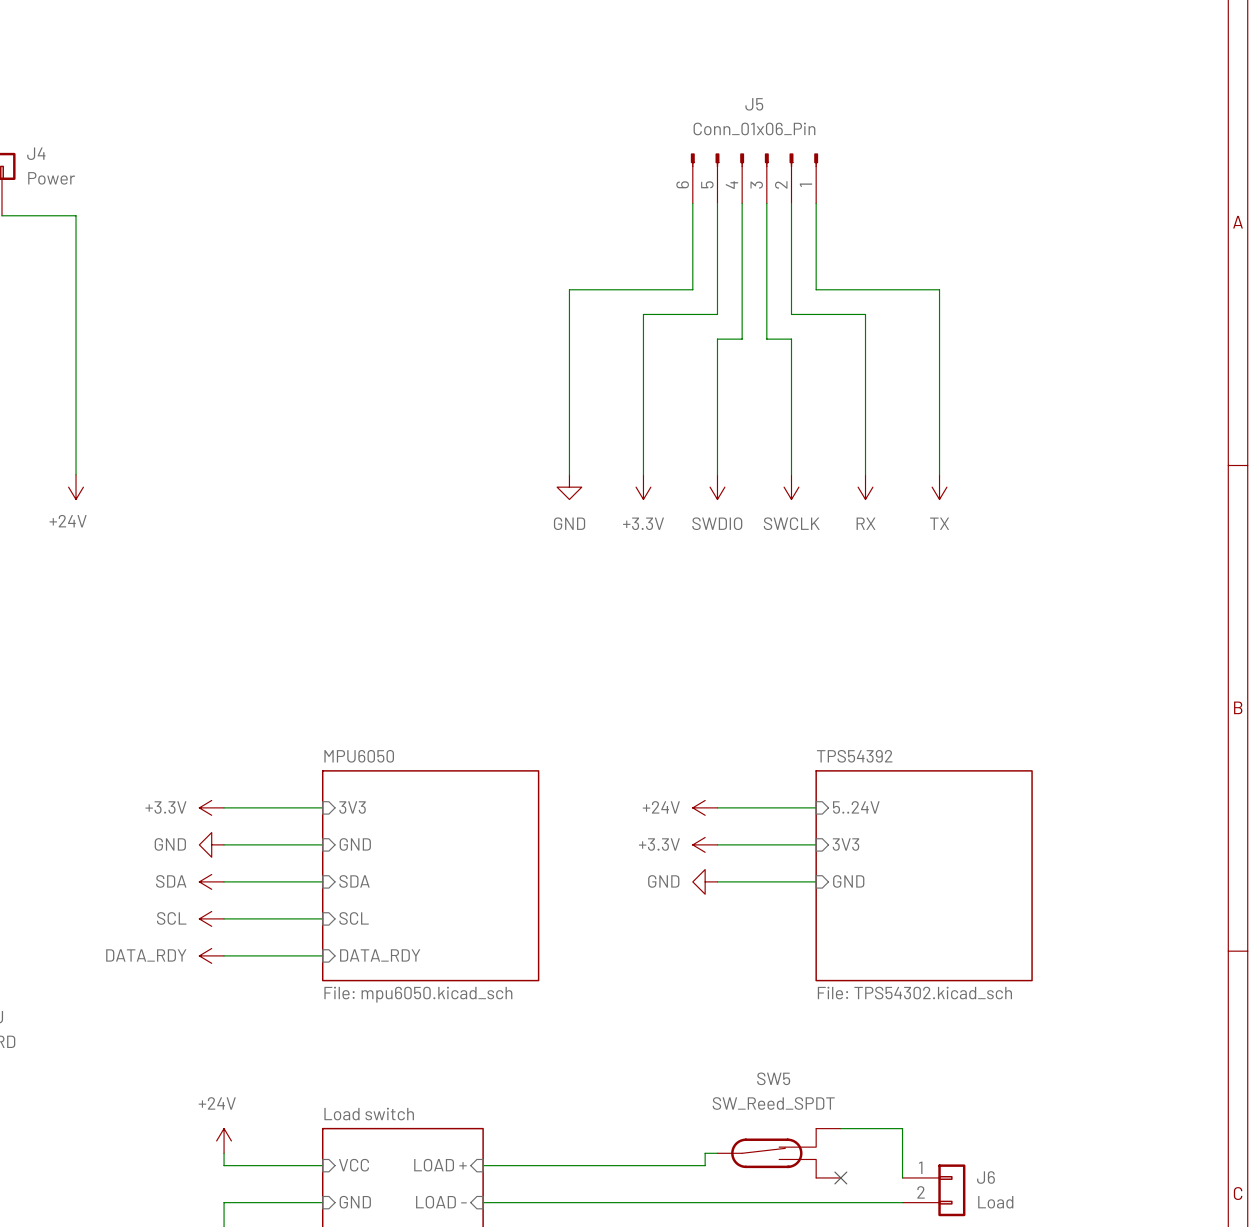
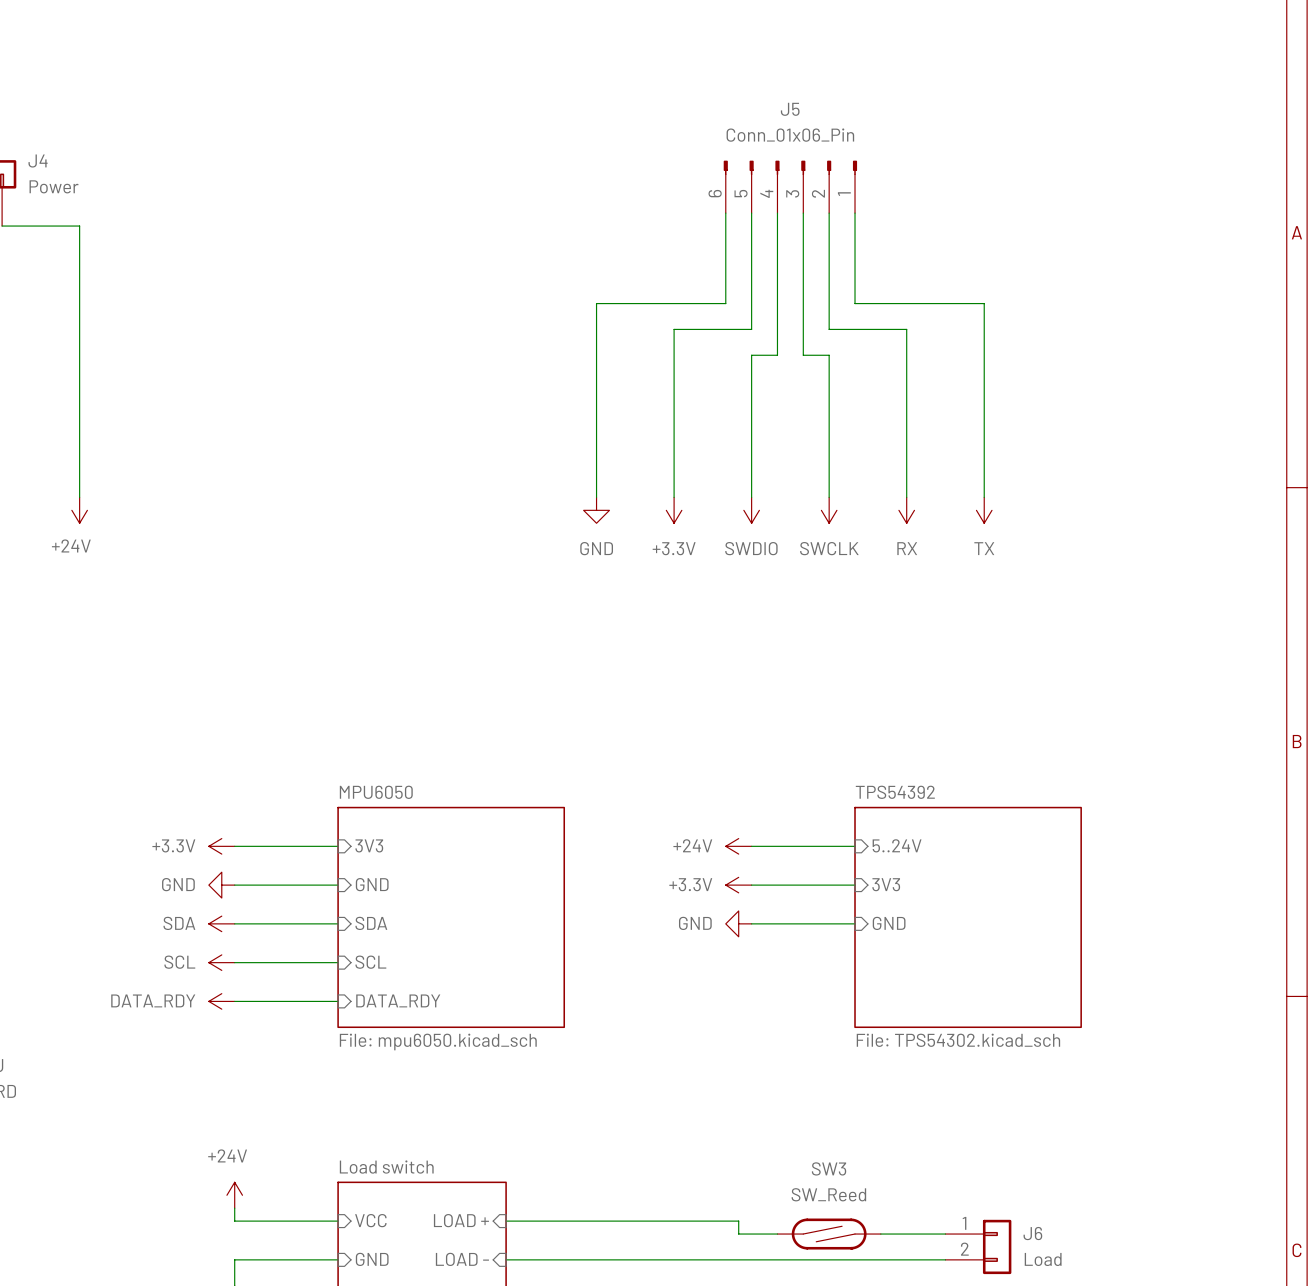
wire: (840, 1128) (902, 1128) (902, 1177) -> (880, 1234) (945, 1234)
wire: (717, 1153) (705, 1153) (705, 1165) -> (777, 1234) (738, 1234) (738, 1221)
SW5: SW_Reed_SPDT (779, 1153) -> none
SW3: none -> SW_Reed (829, 1234)
no-connect mark: (840, 1177) -> none

